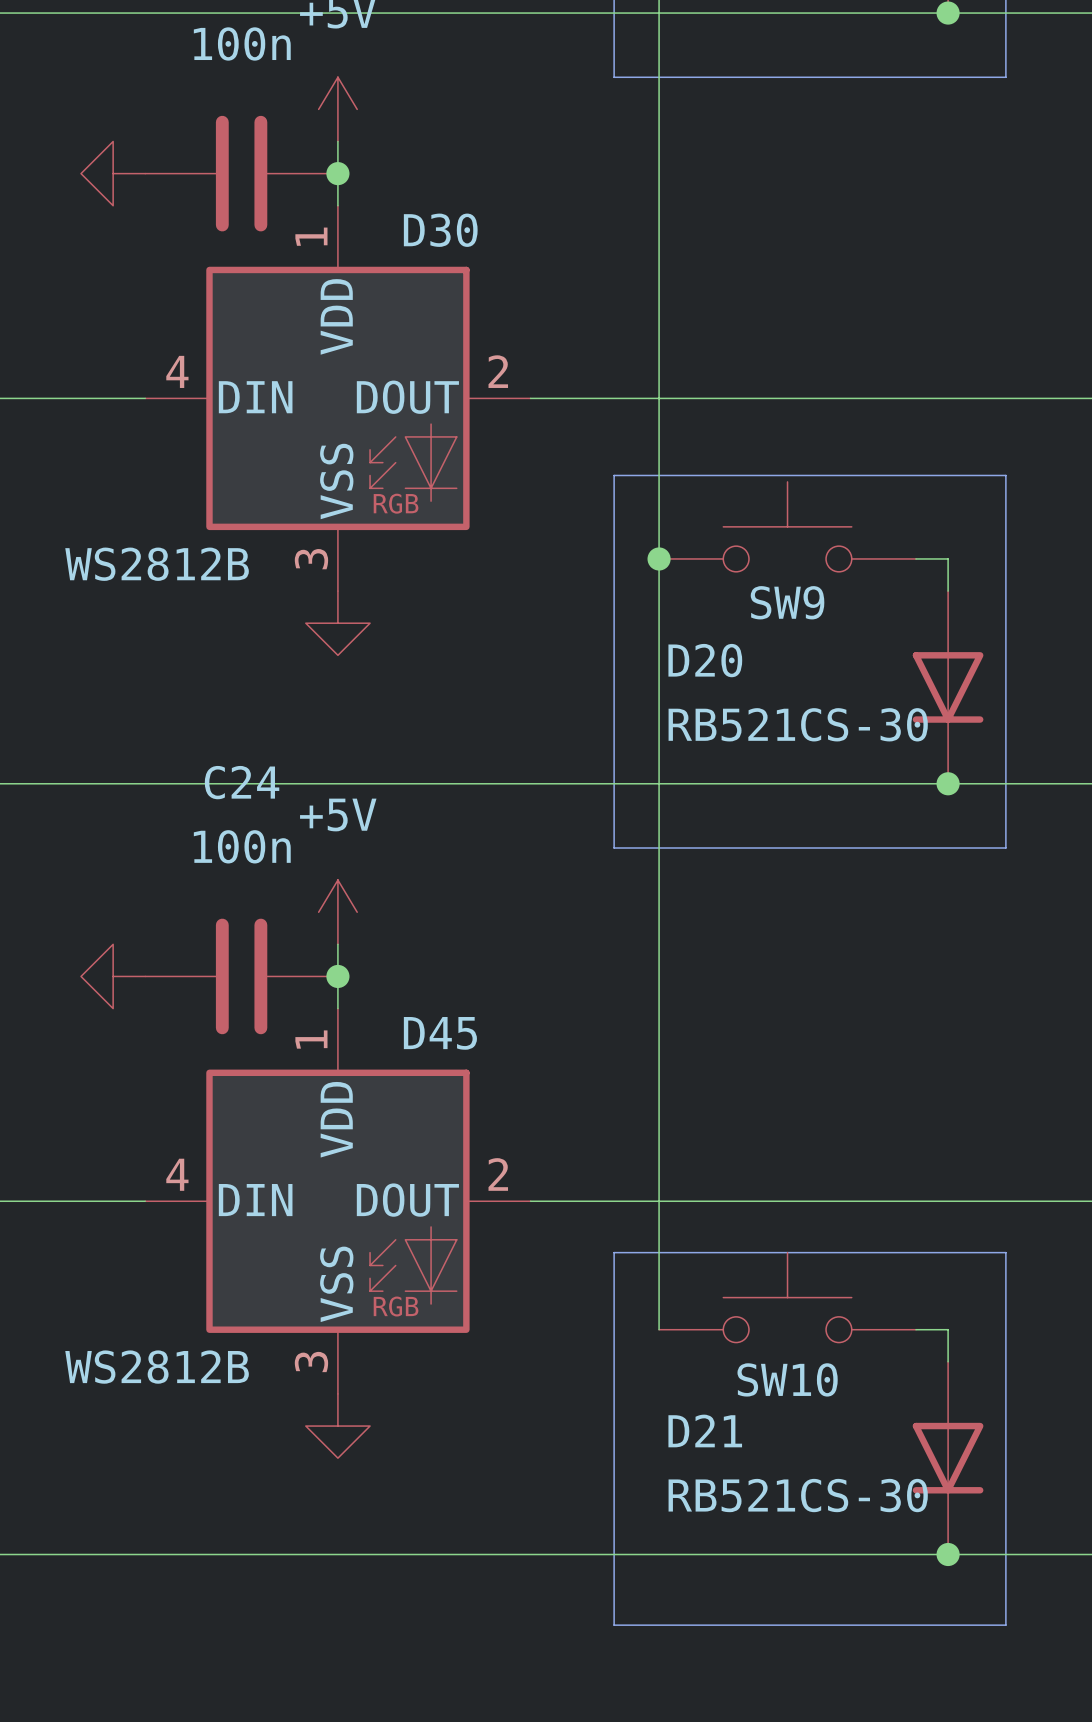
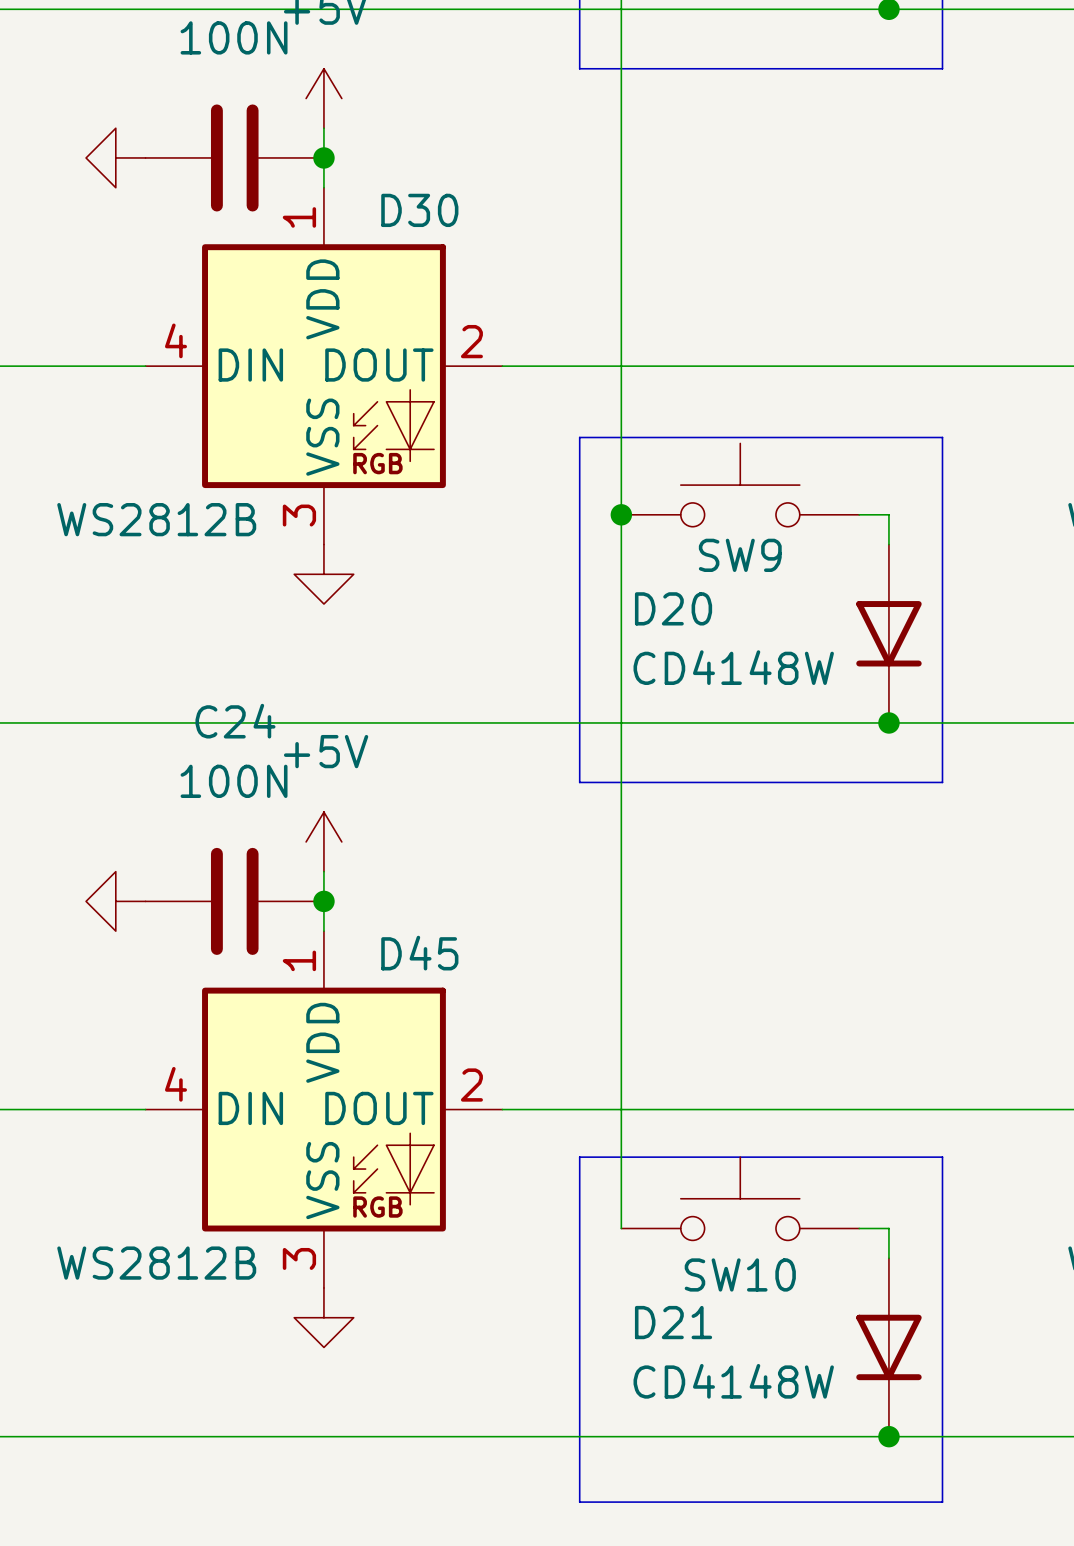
part value: 100n (242, 43) -> 100N (234, 37)
D20 value: RB521CS-30 (798, 724) -> CD4148W (733, 667)
C24 value: 100n (242, 846) -> 100N (234, 781)
D21 value: RB521CS-30 (798, 1495) -> CD4148W (733, 1381)

